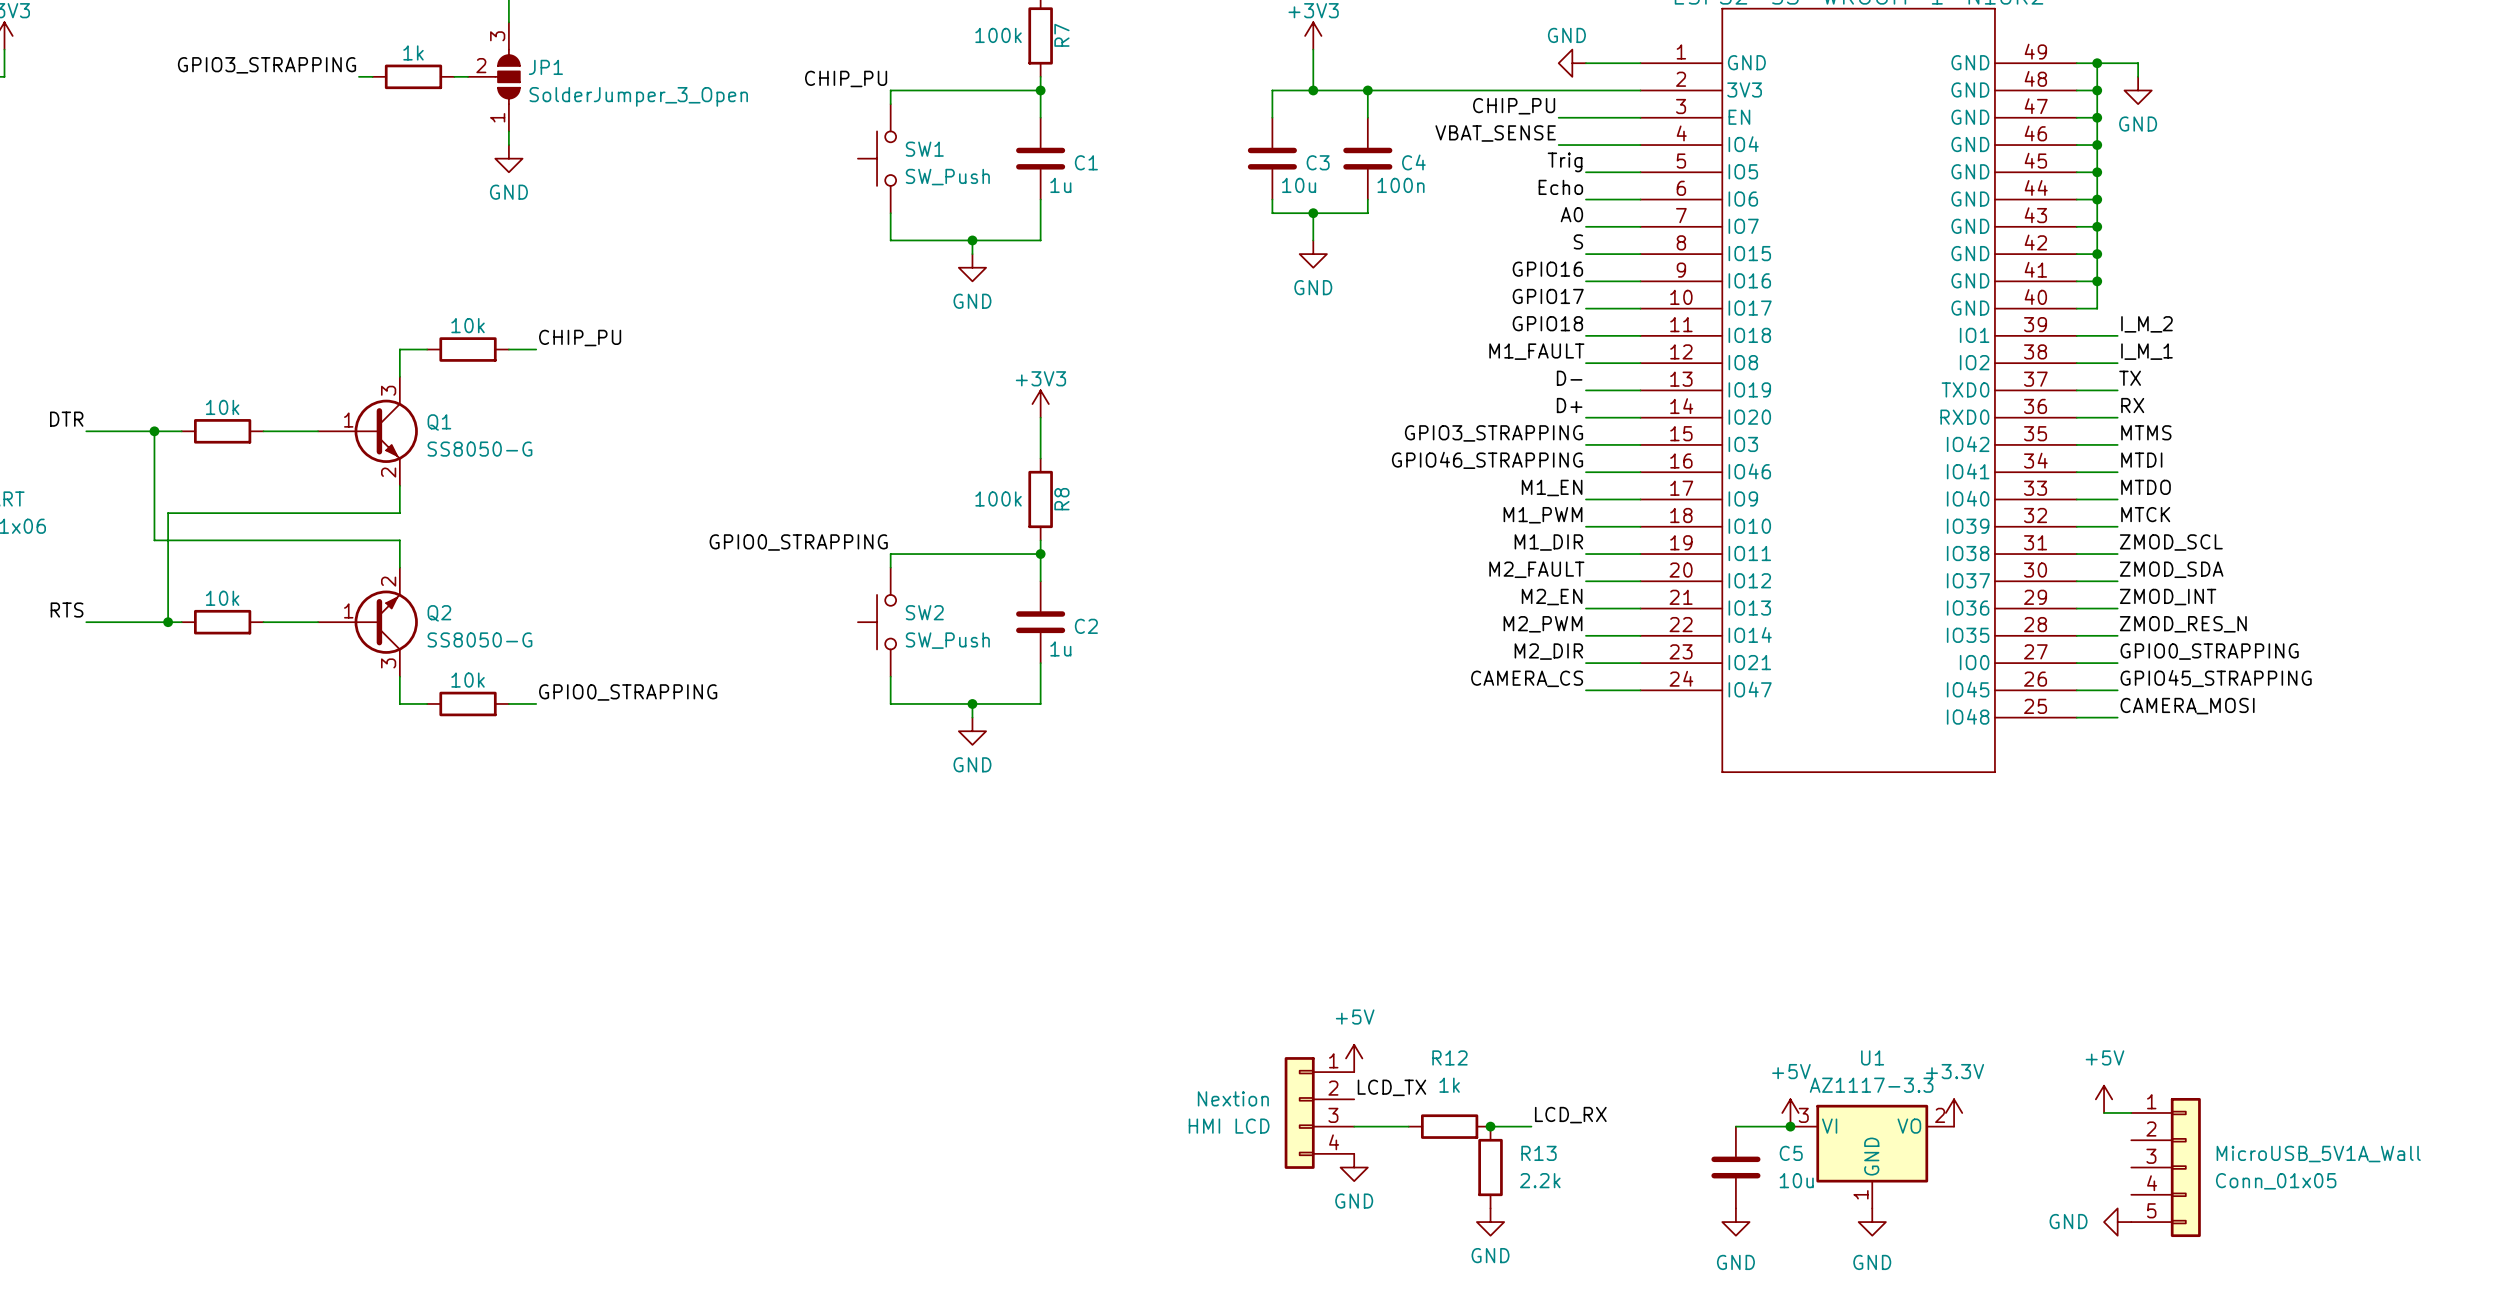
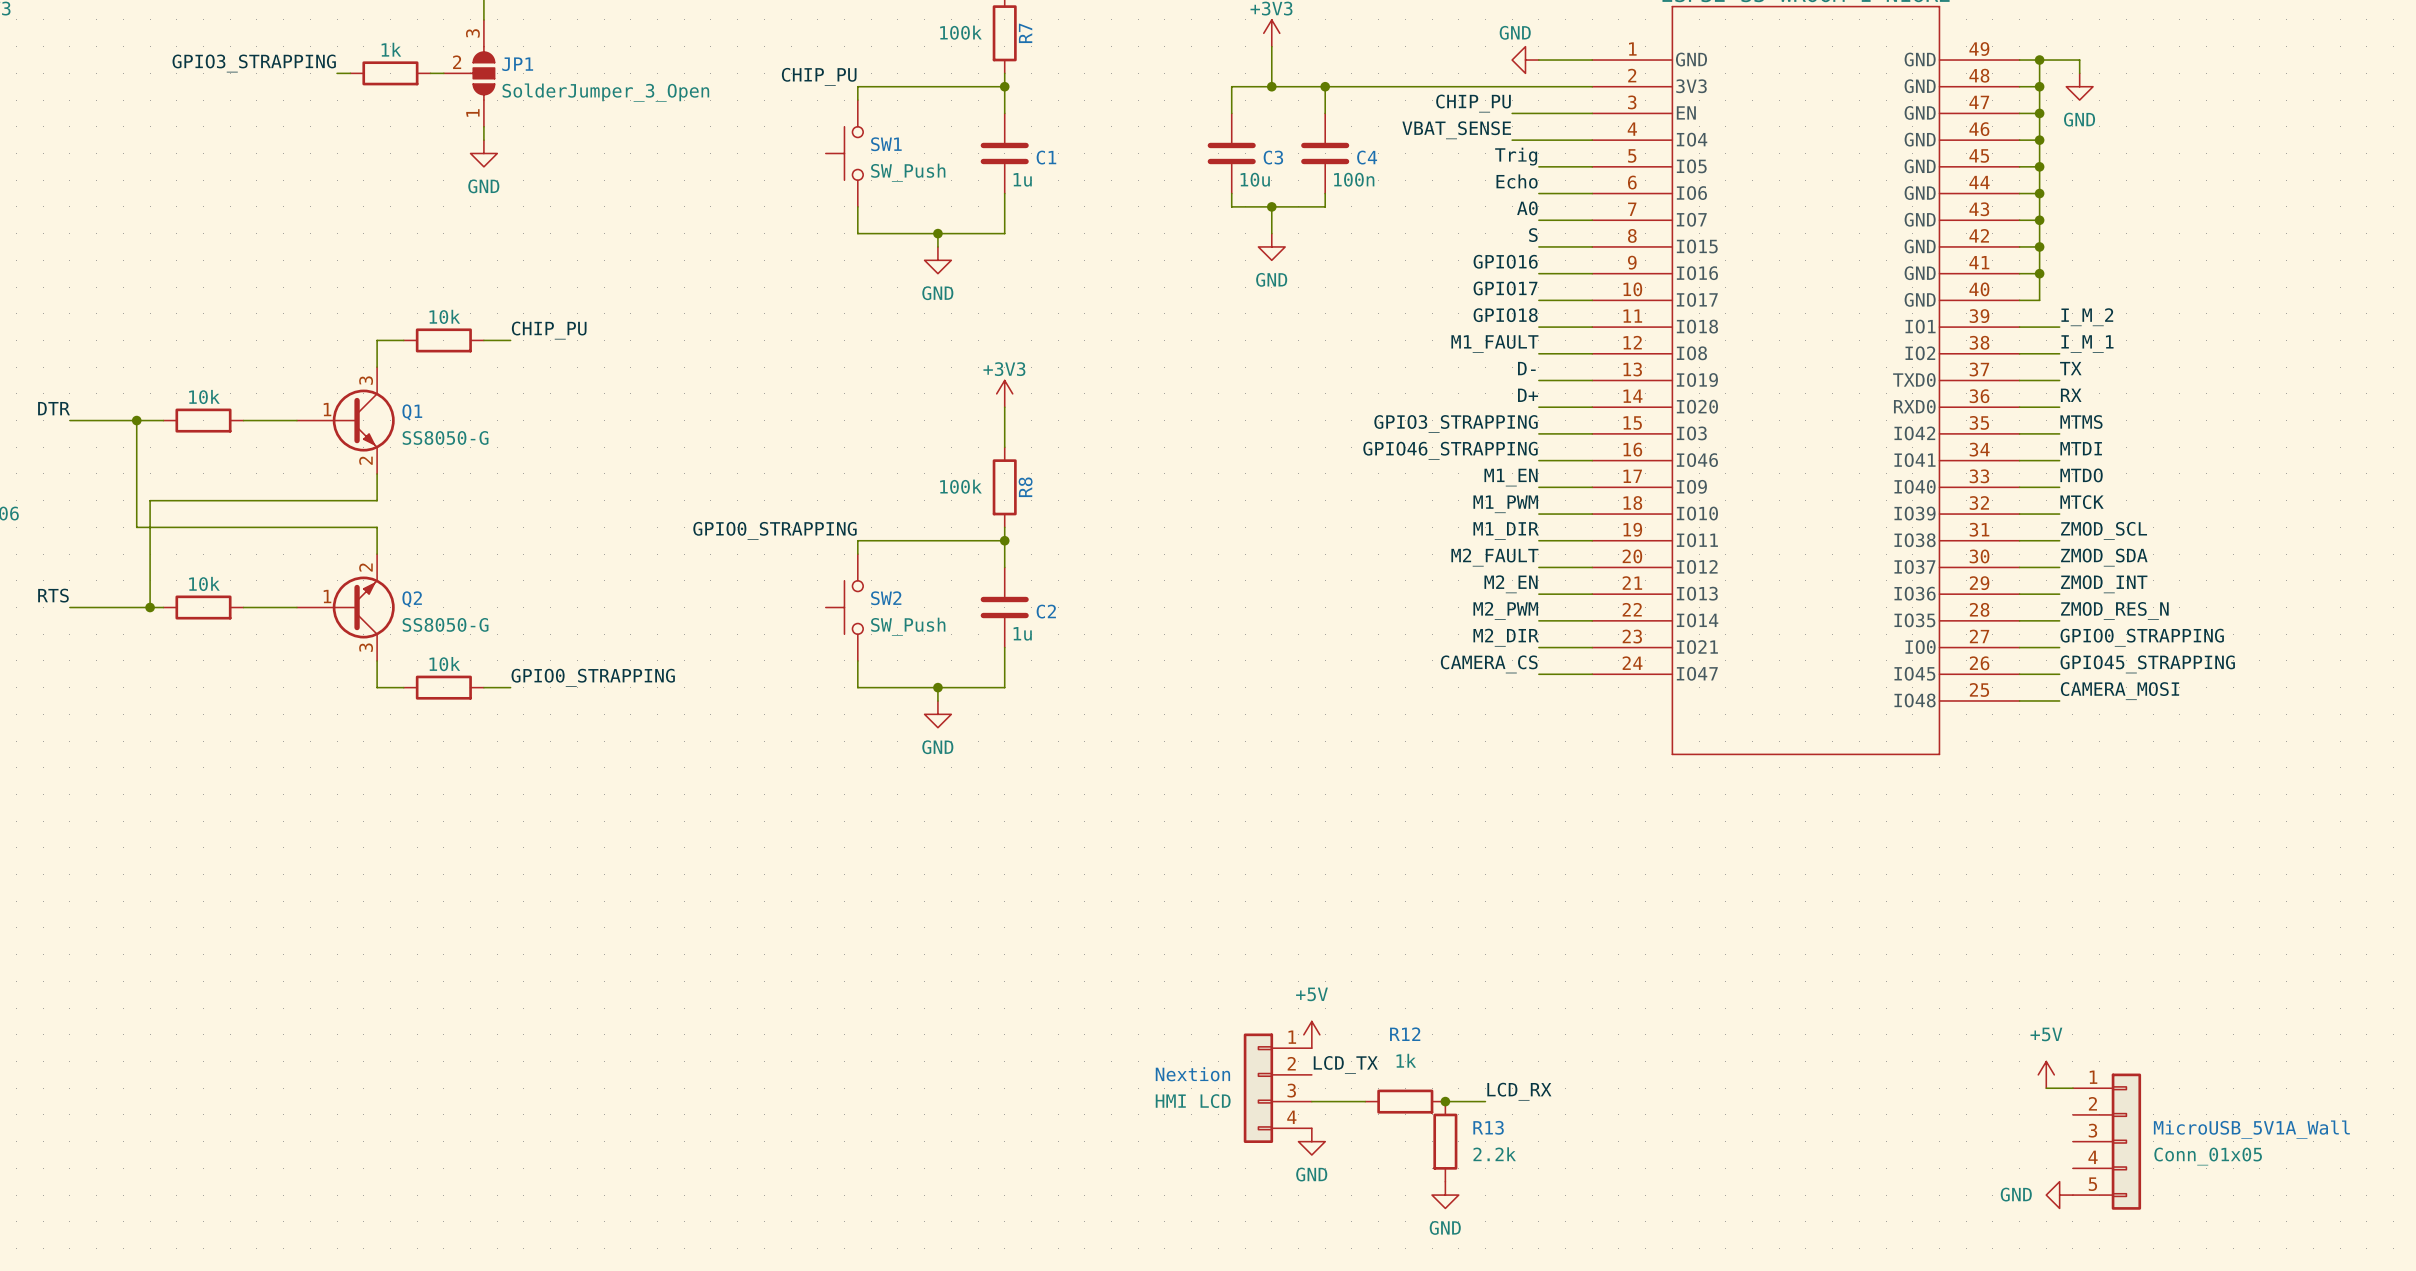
power symbol: +5V (1790, 1112) -> none
power symbol: +3.3V (1954, 1112) -> none
wire: (1735, 1126) (1790, 1126) -> none
junction: (1790, 1126) -> none
U1: AZ1117-3.3 (1872, 1156) -> none
C5: 10u (1735, 1167) -> none
power symbol: GND (1735, 1222) -> none
power symbol: GND (1872, 1222) -> none

